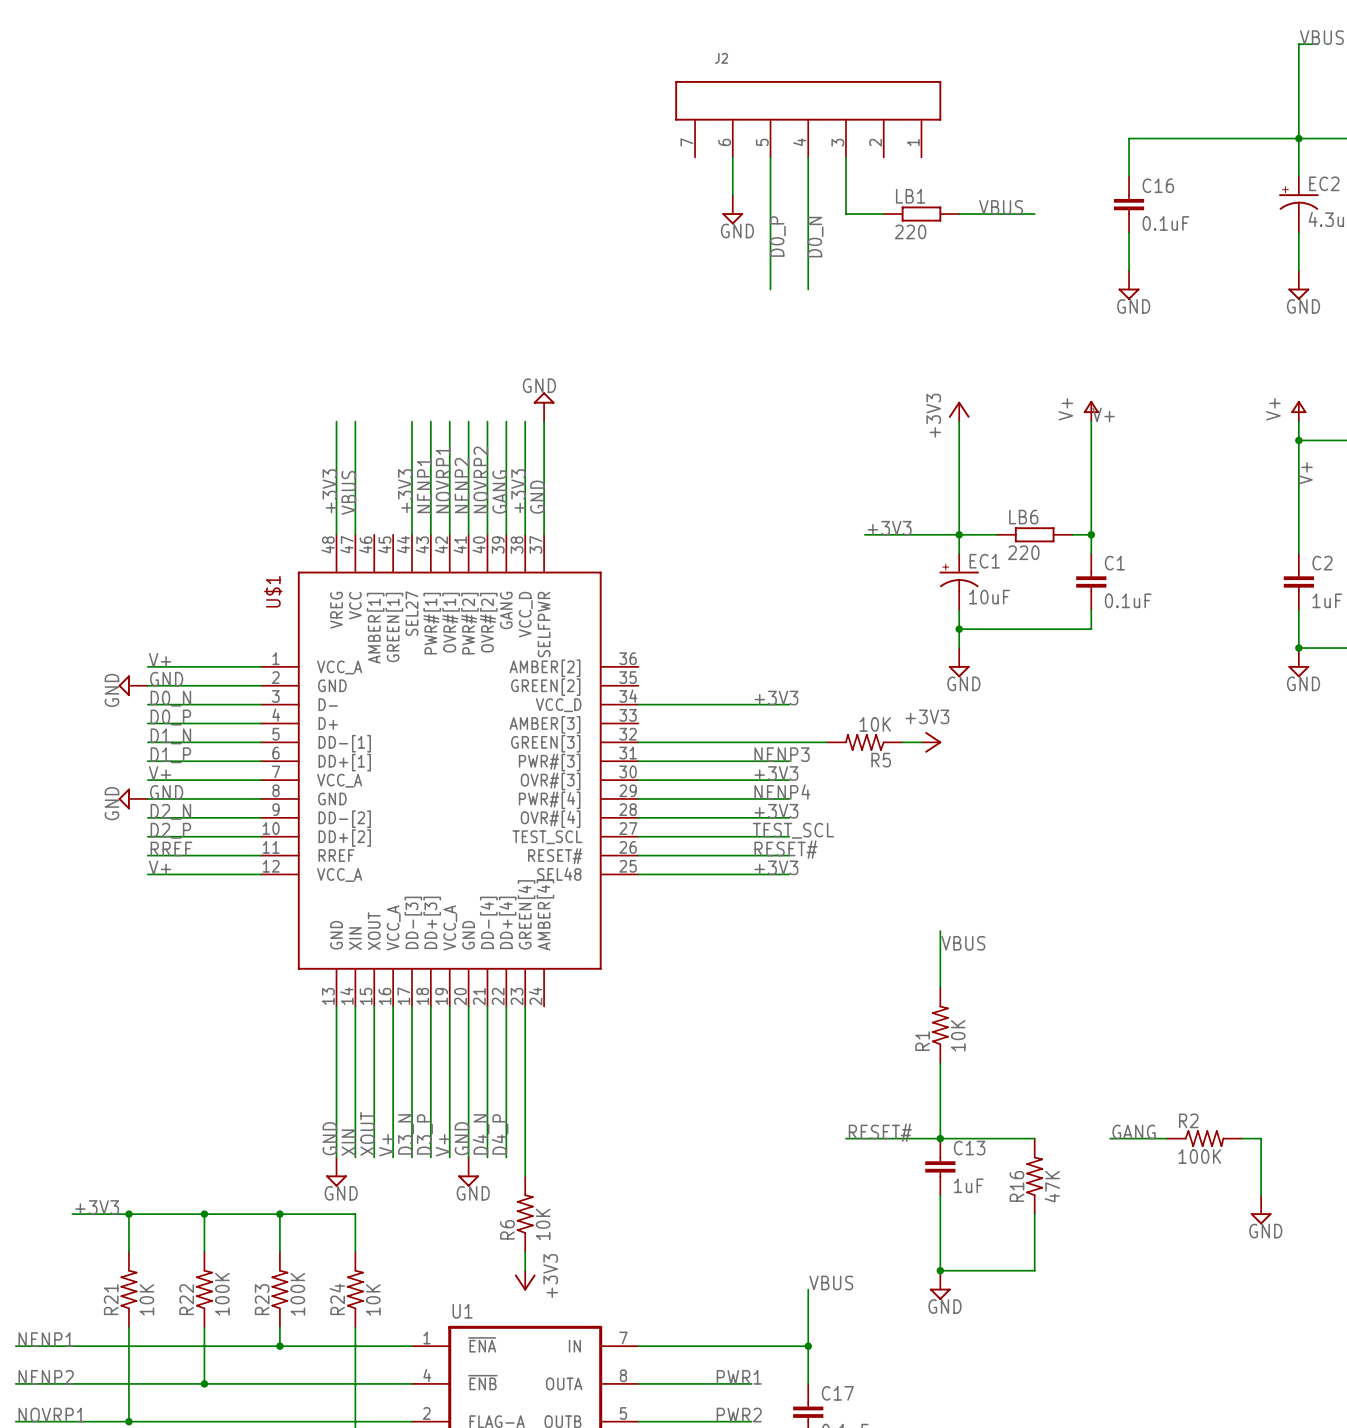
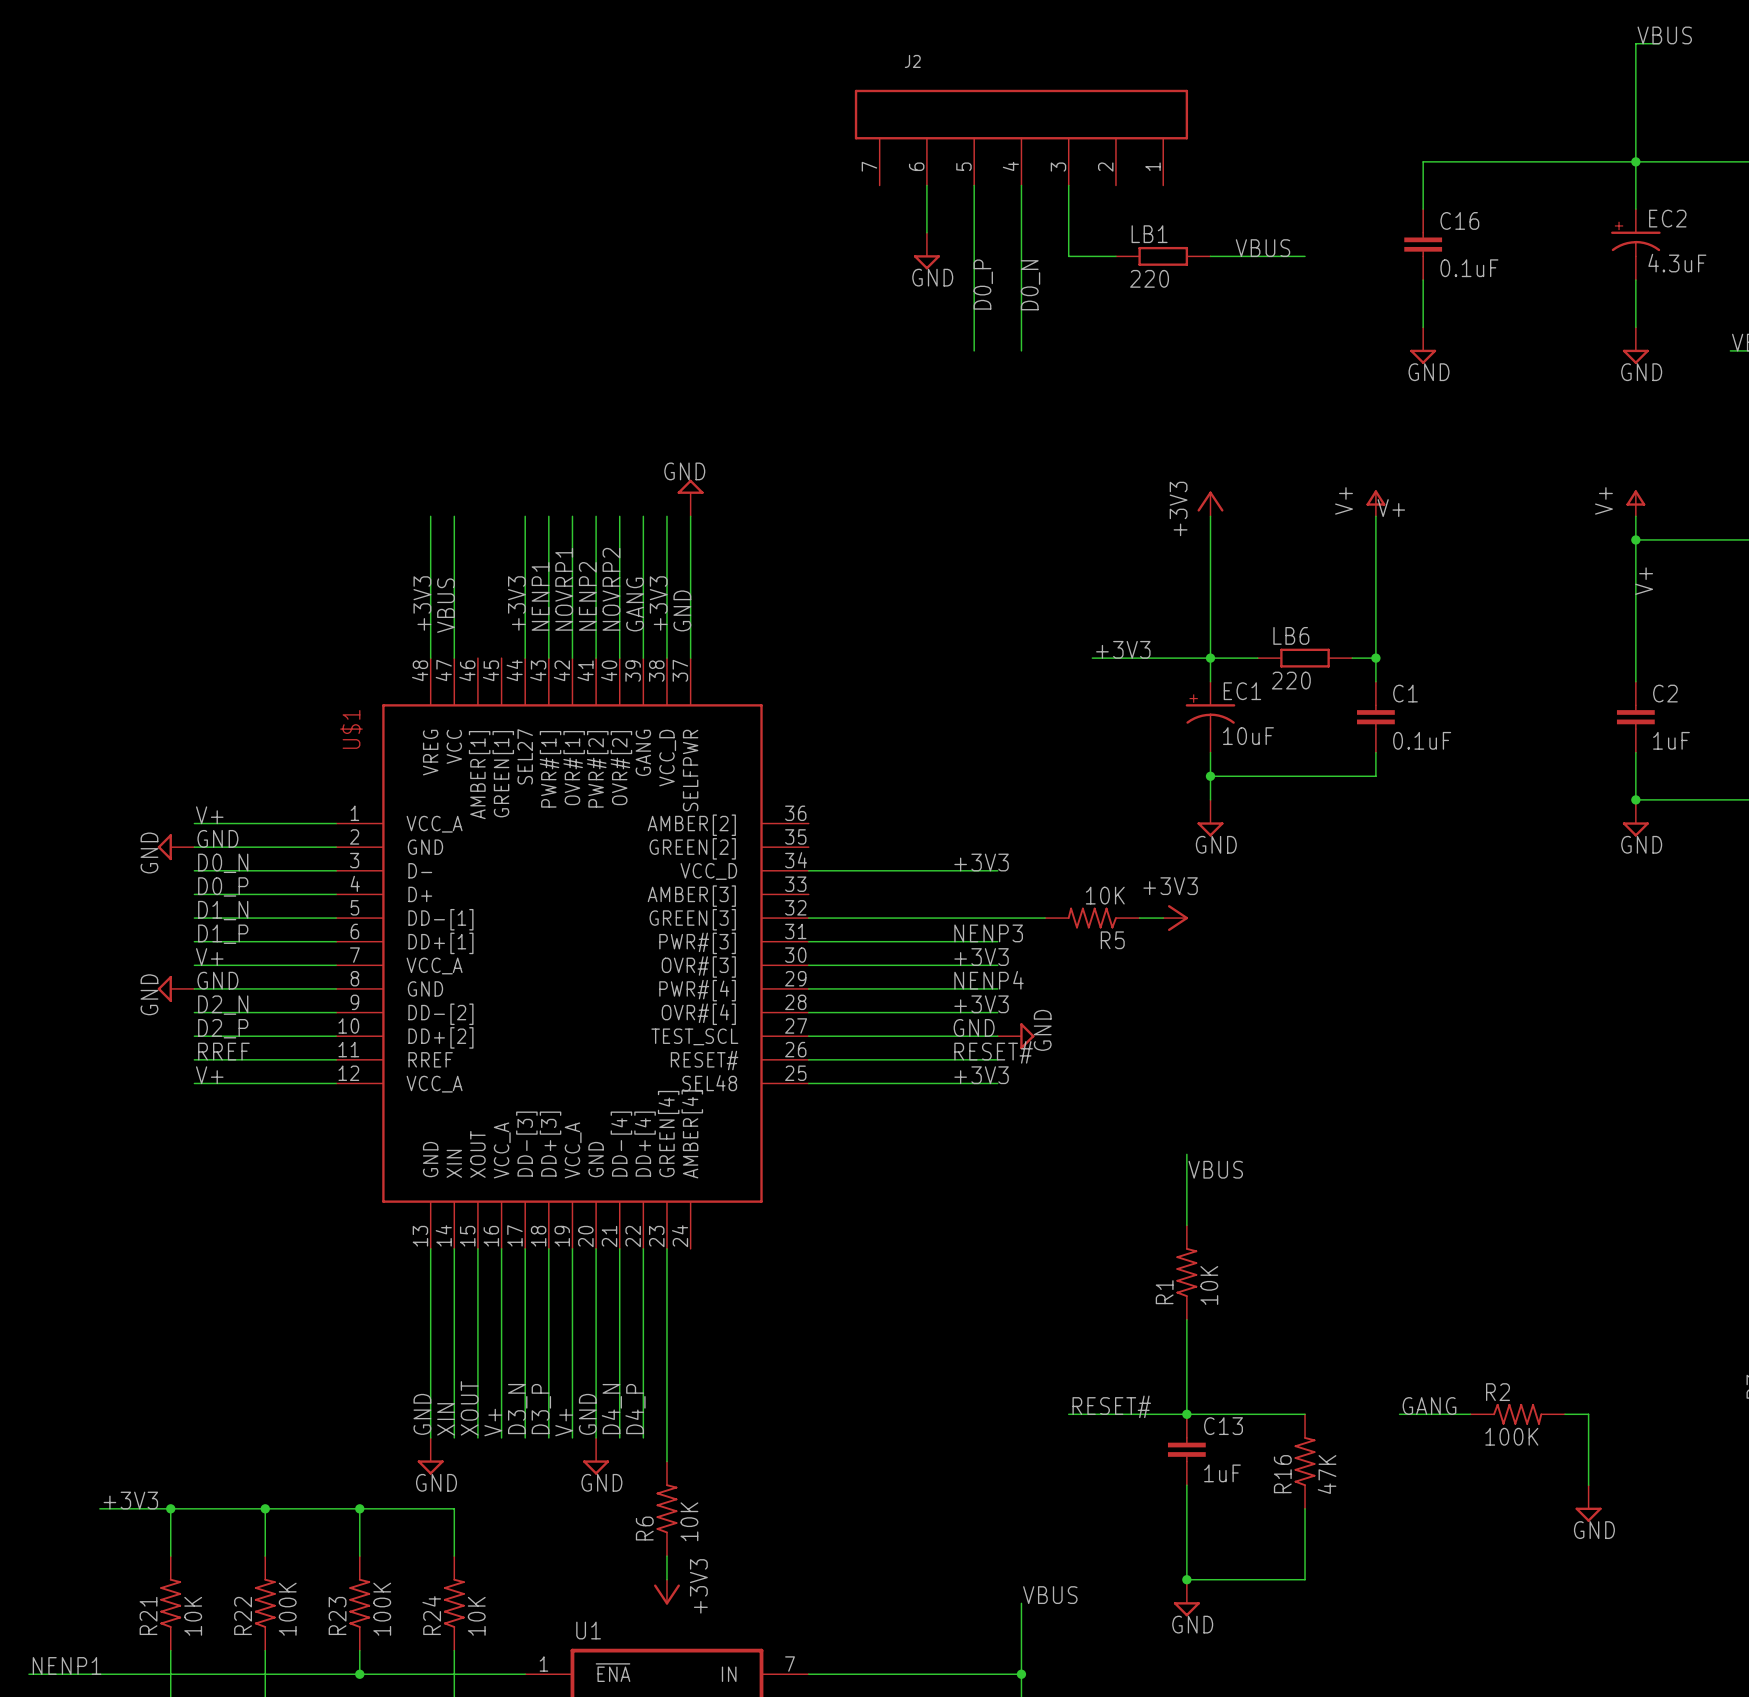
label: TEST_SCL (793, 830) -> GND (974, 1027)
power symbol: none -> GND (1016, 1036)

